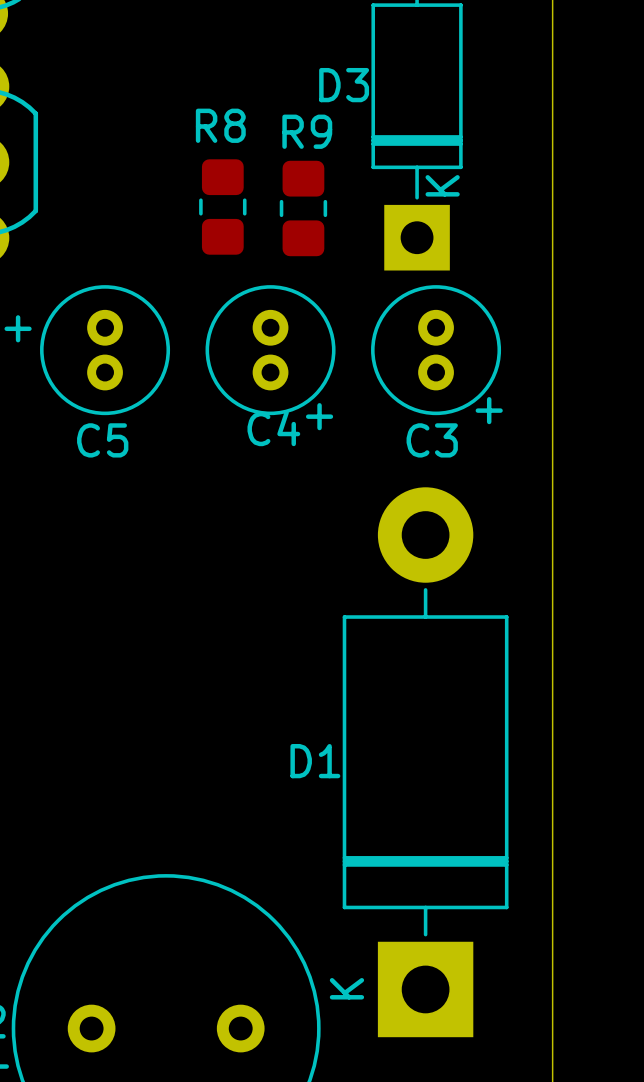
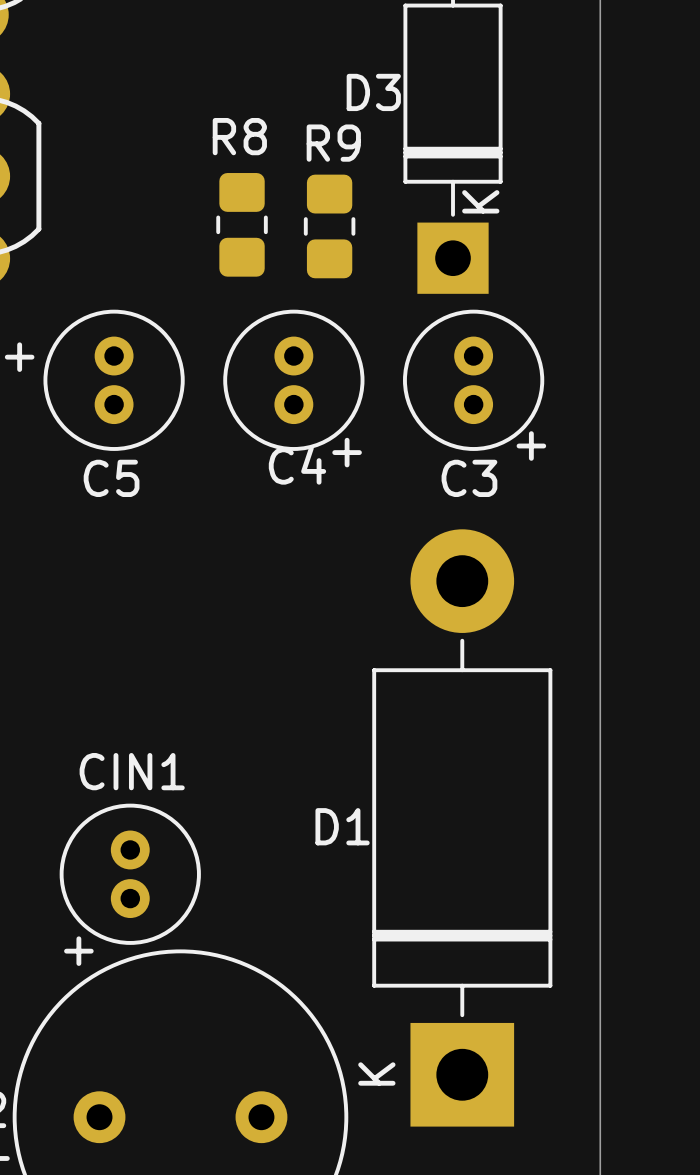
CIN1: none -> (130, 874)
text: none -> + (78, 951)

